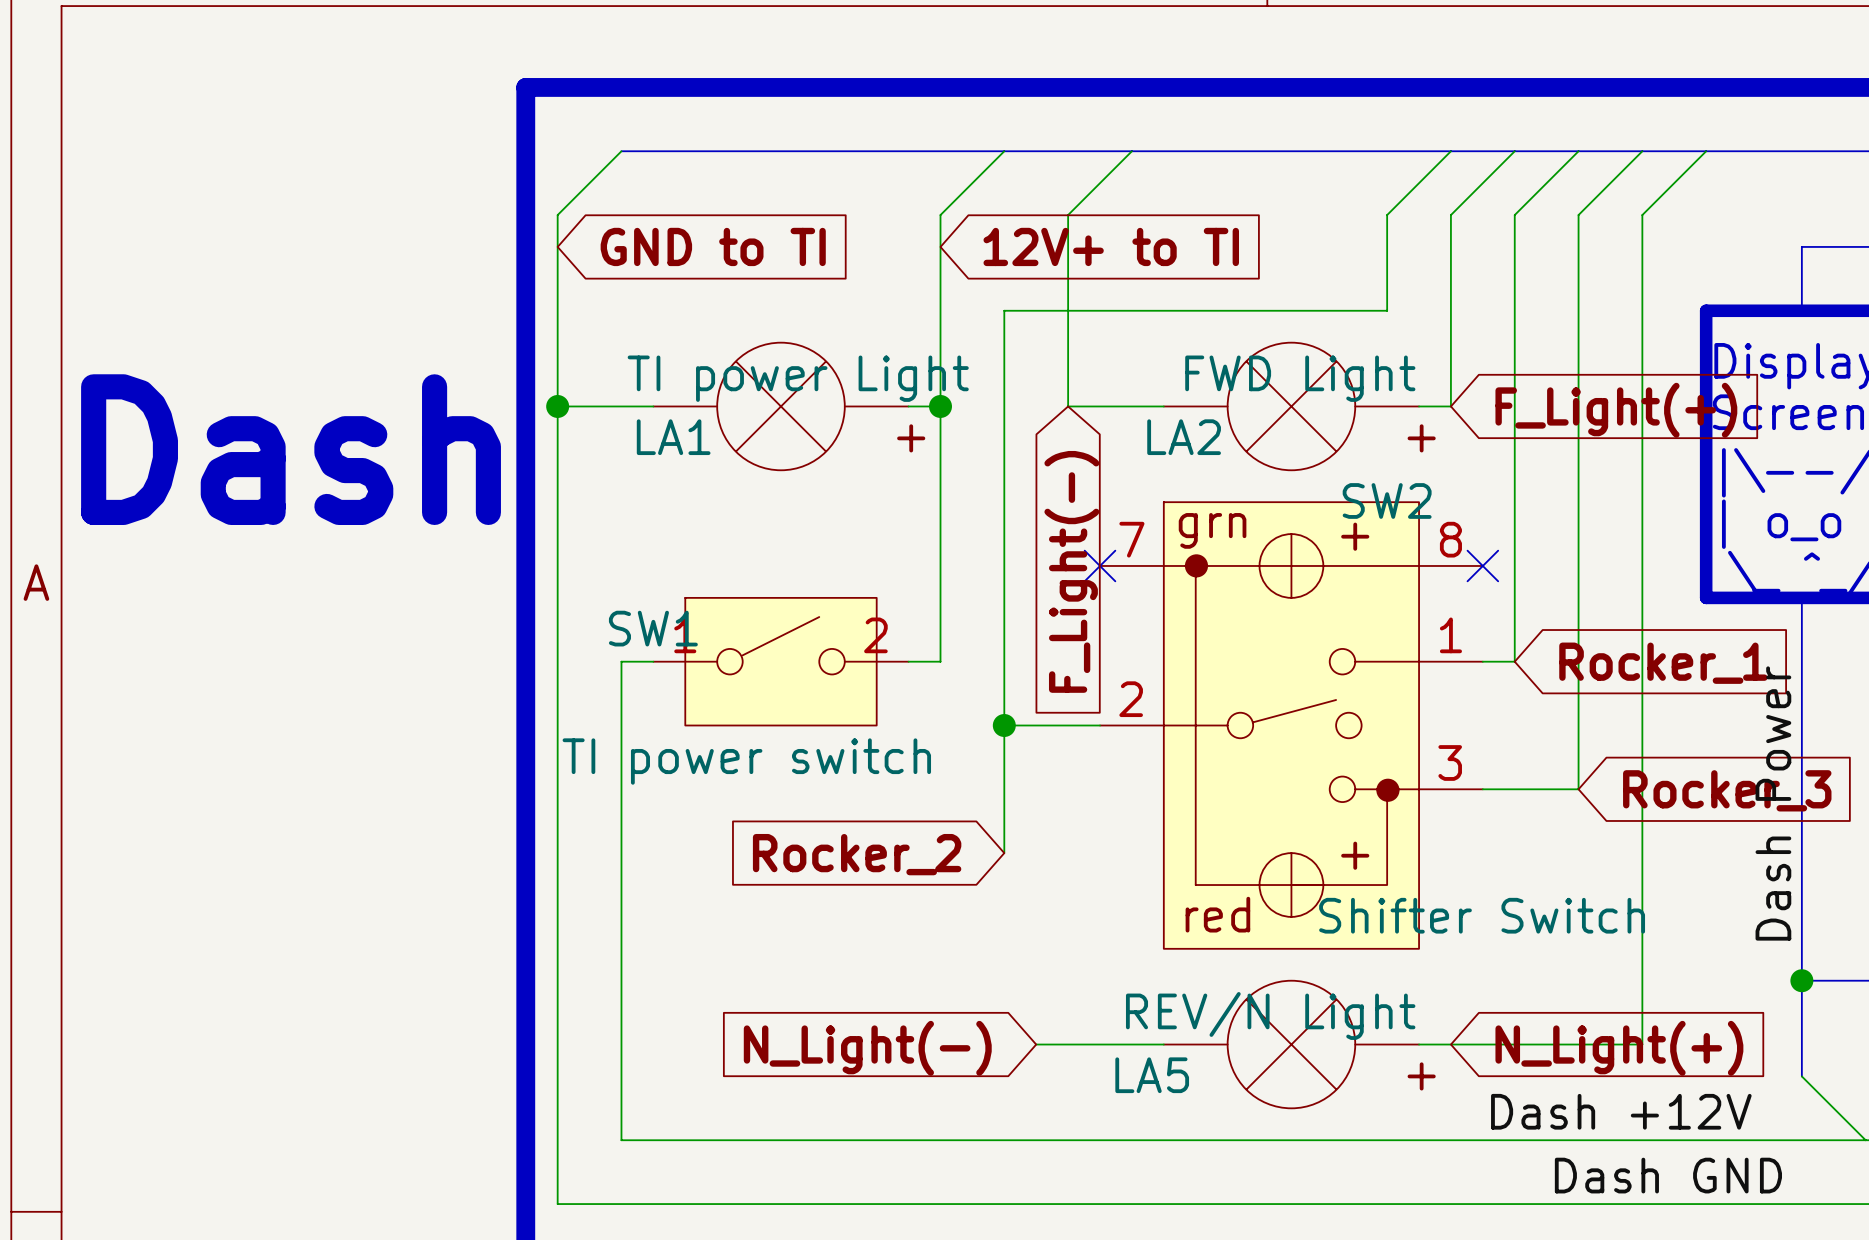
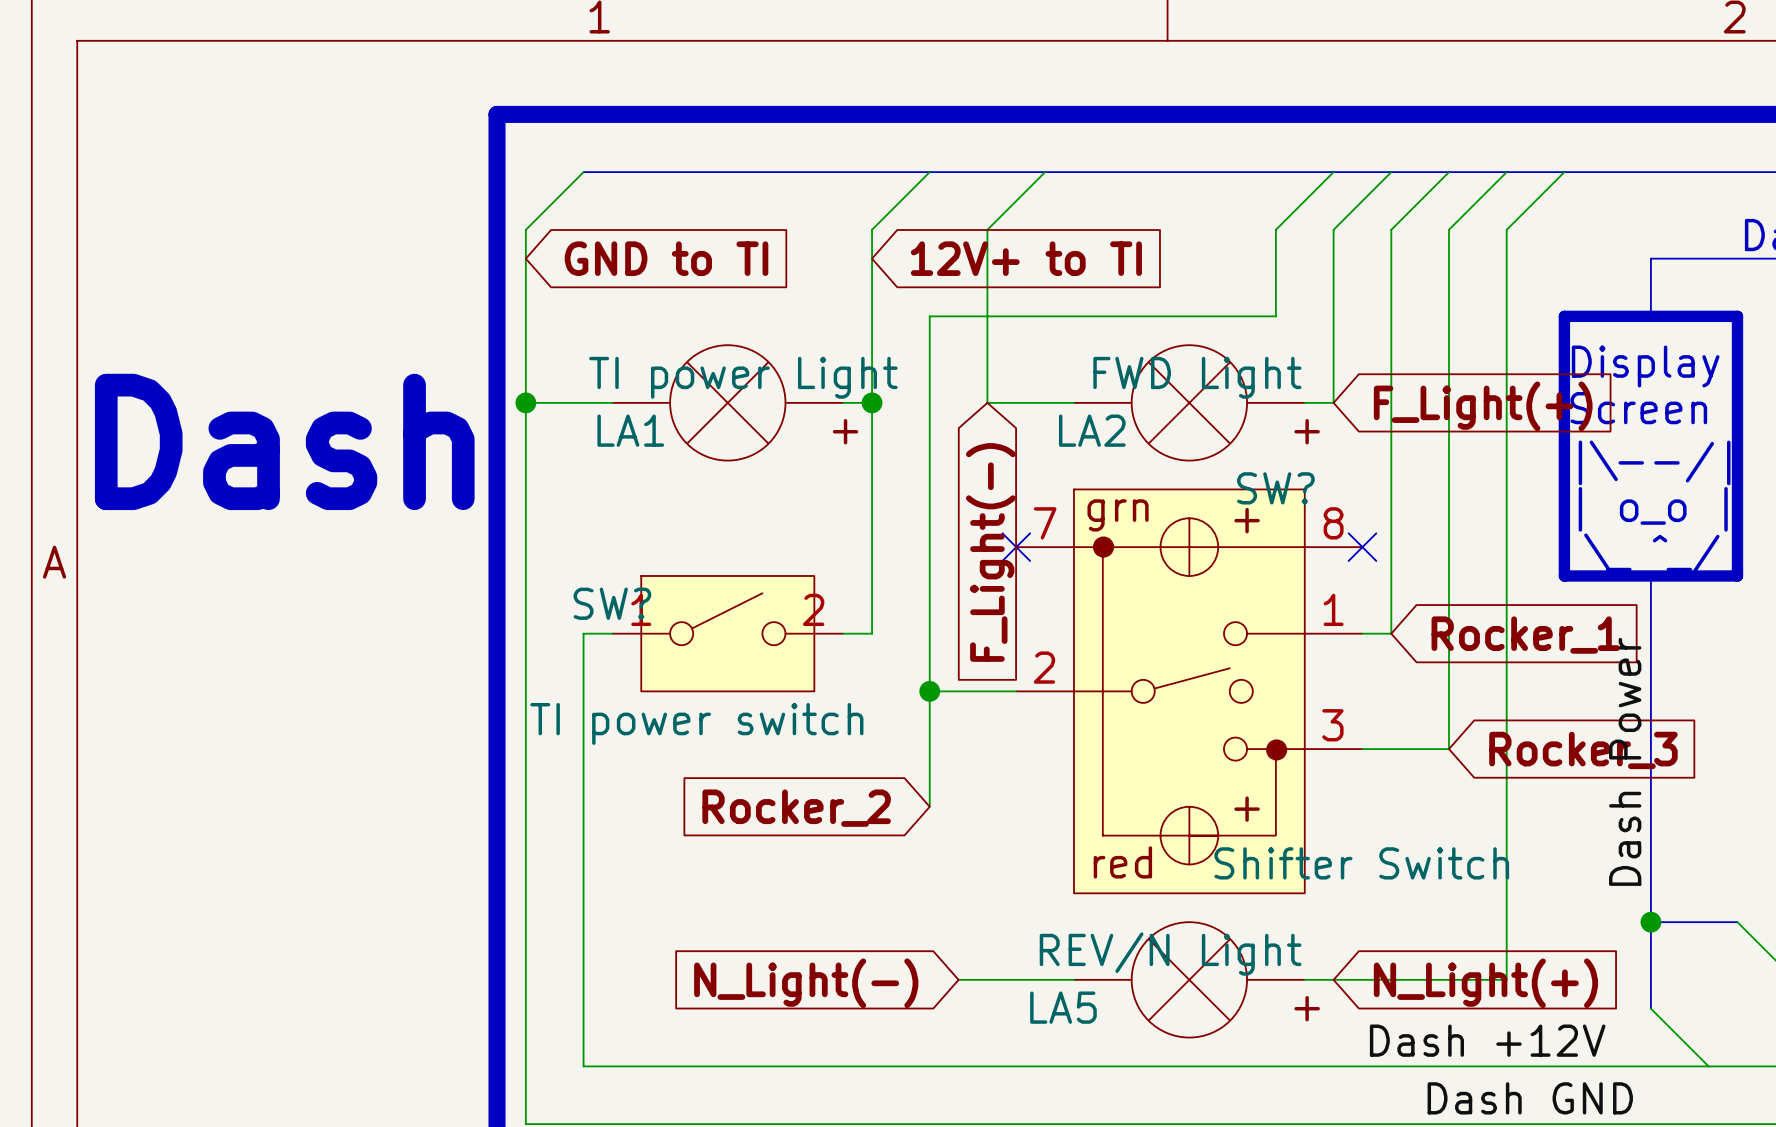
SW2 name: SW2 (1387, 500) -> SW? (1275, 488)
SW1 name: SW1 (653, 628) -> SW? (612, 603)

